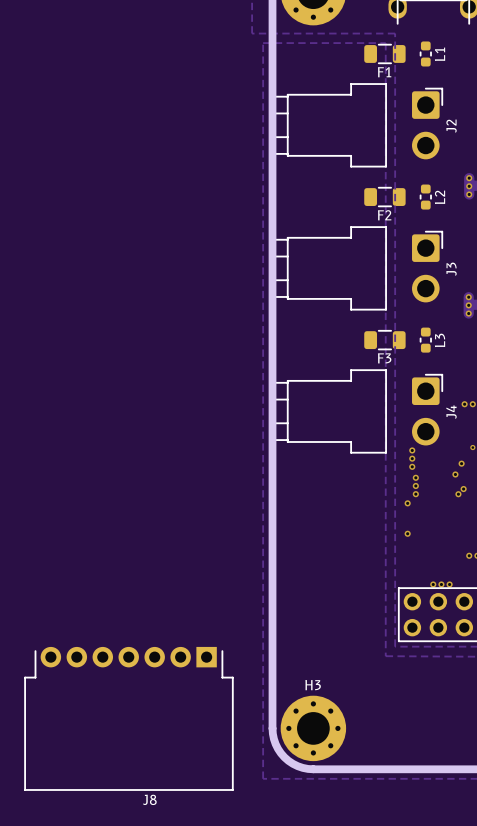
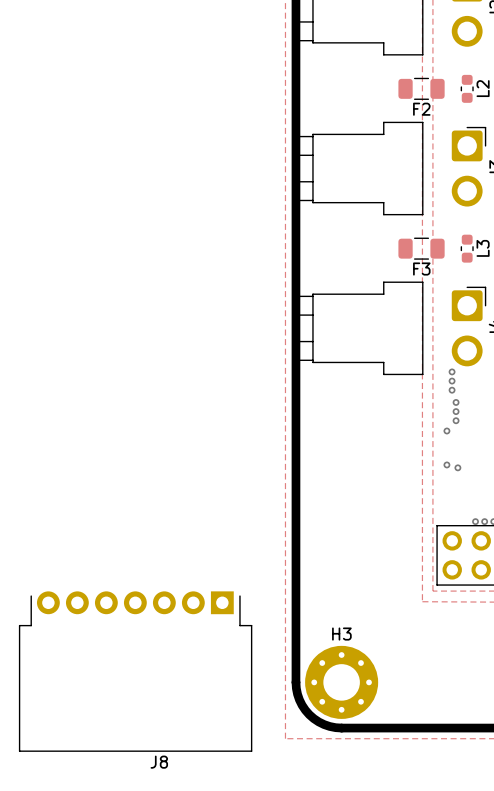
via: none -> (457, 467)

